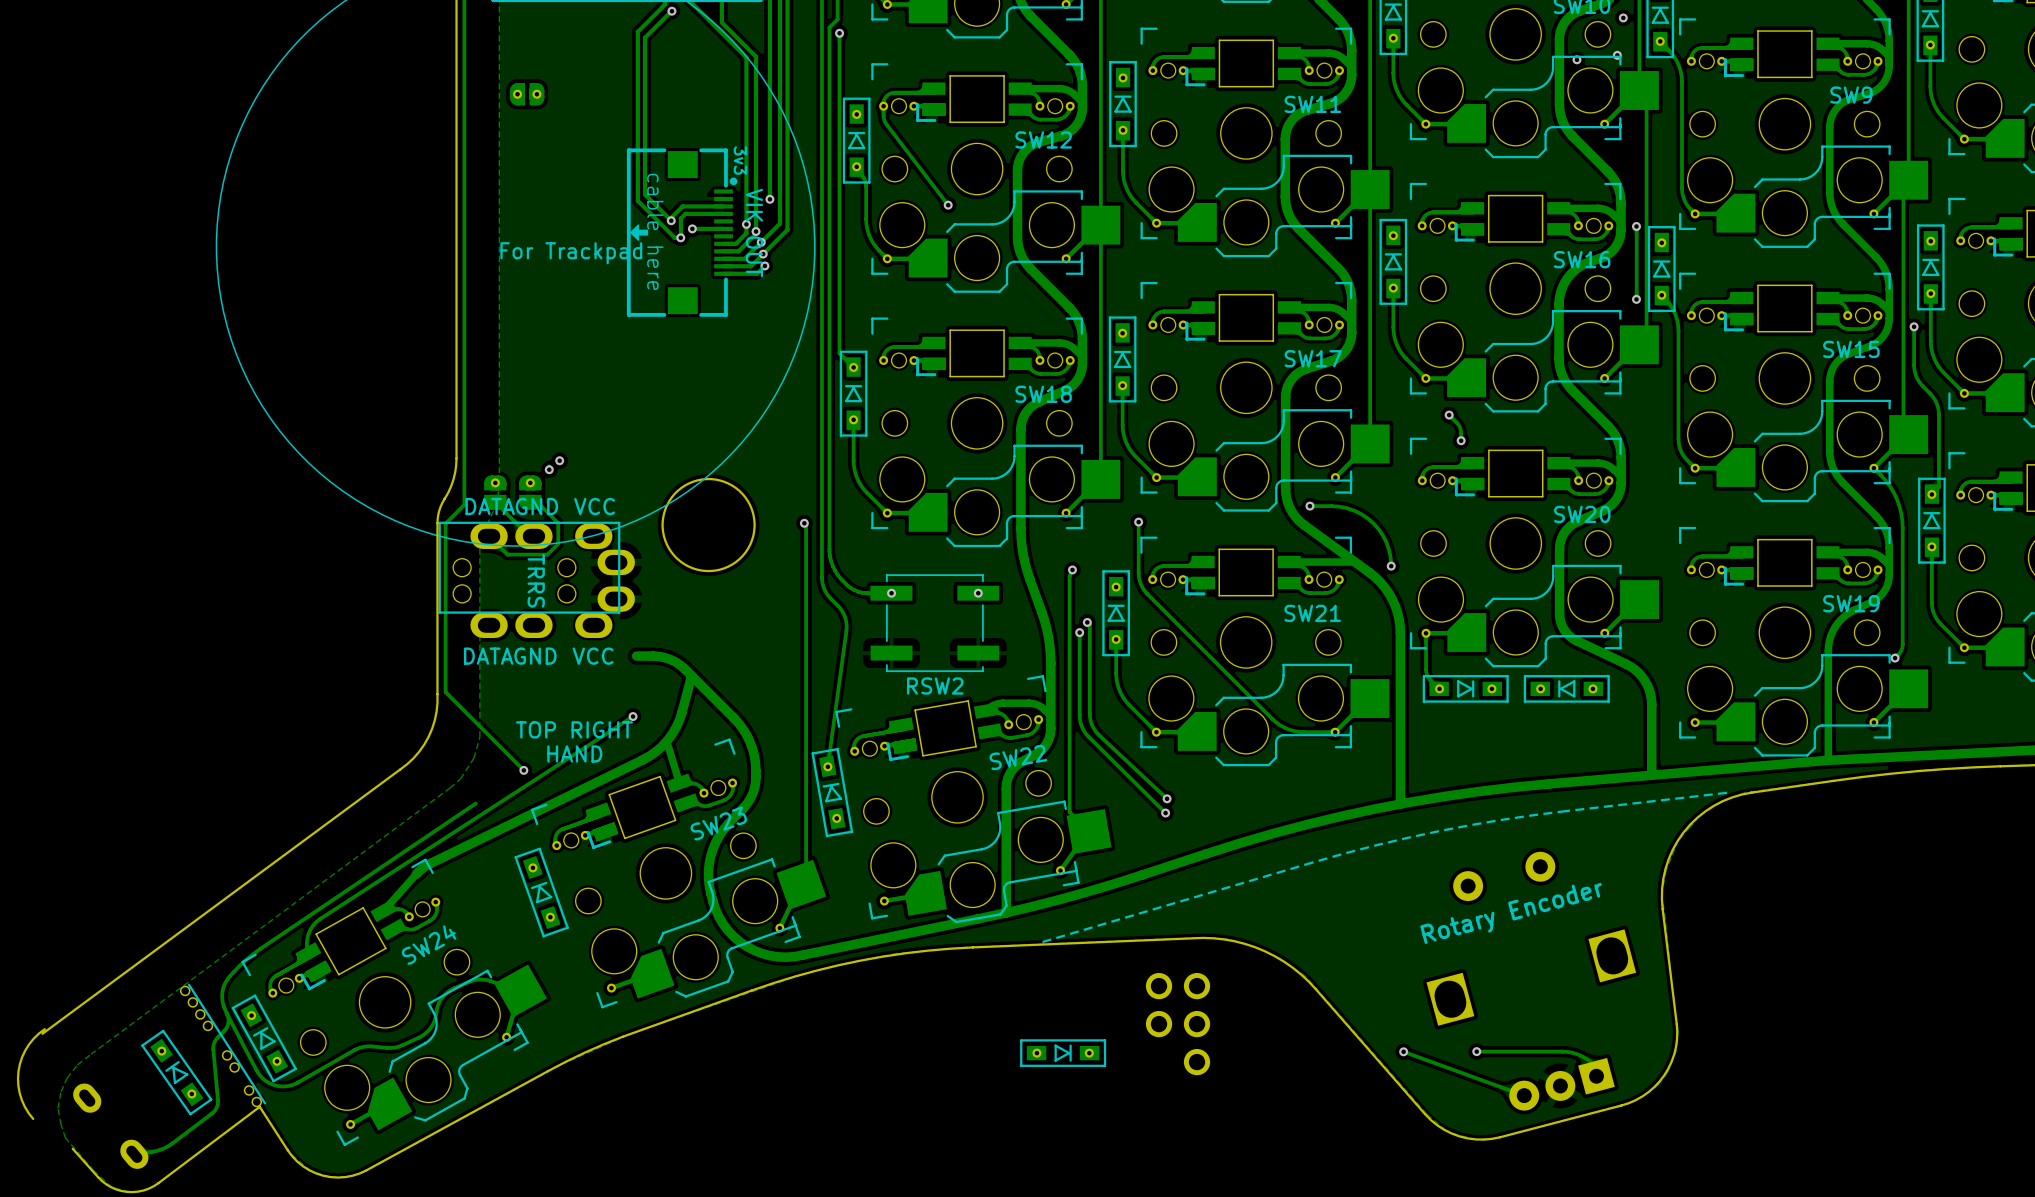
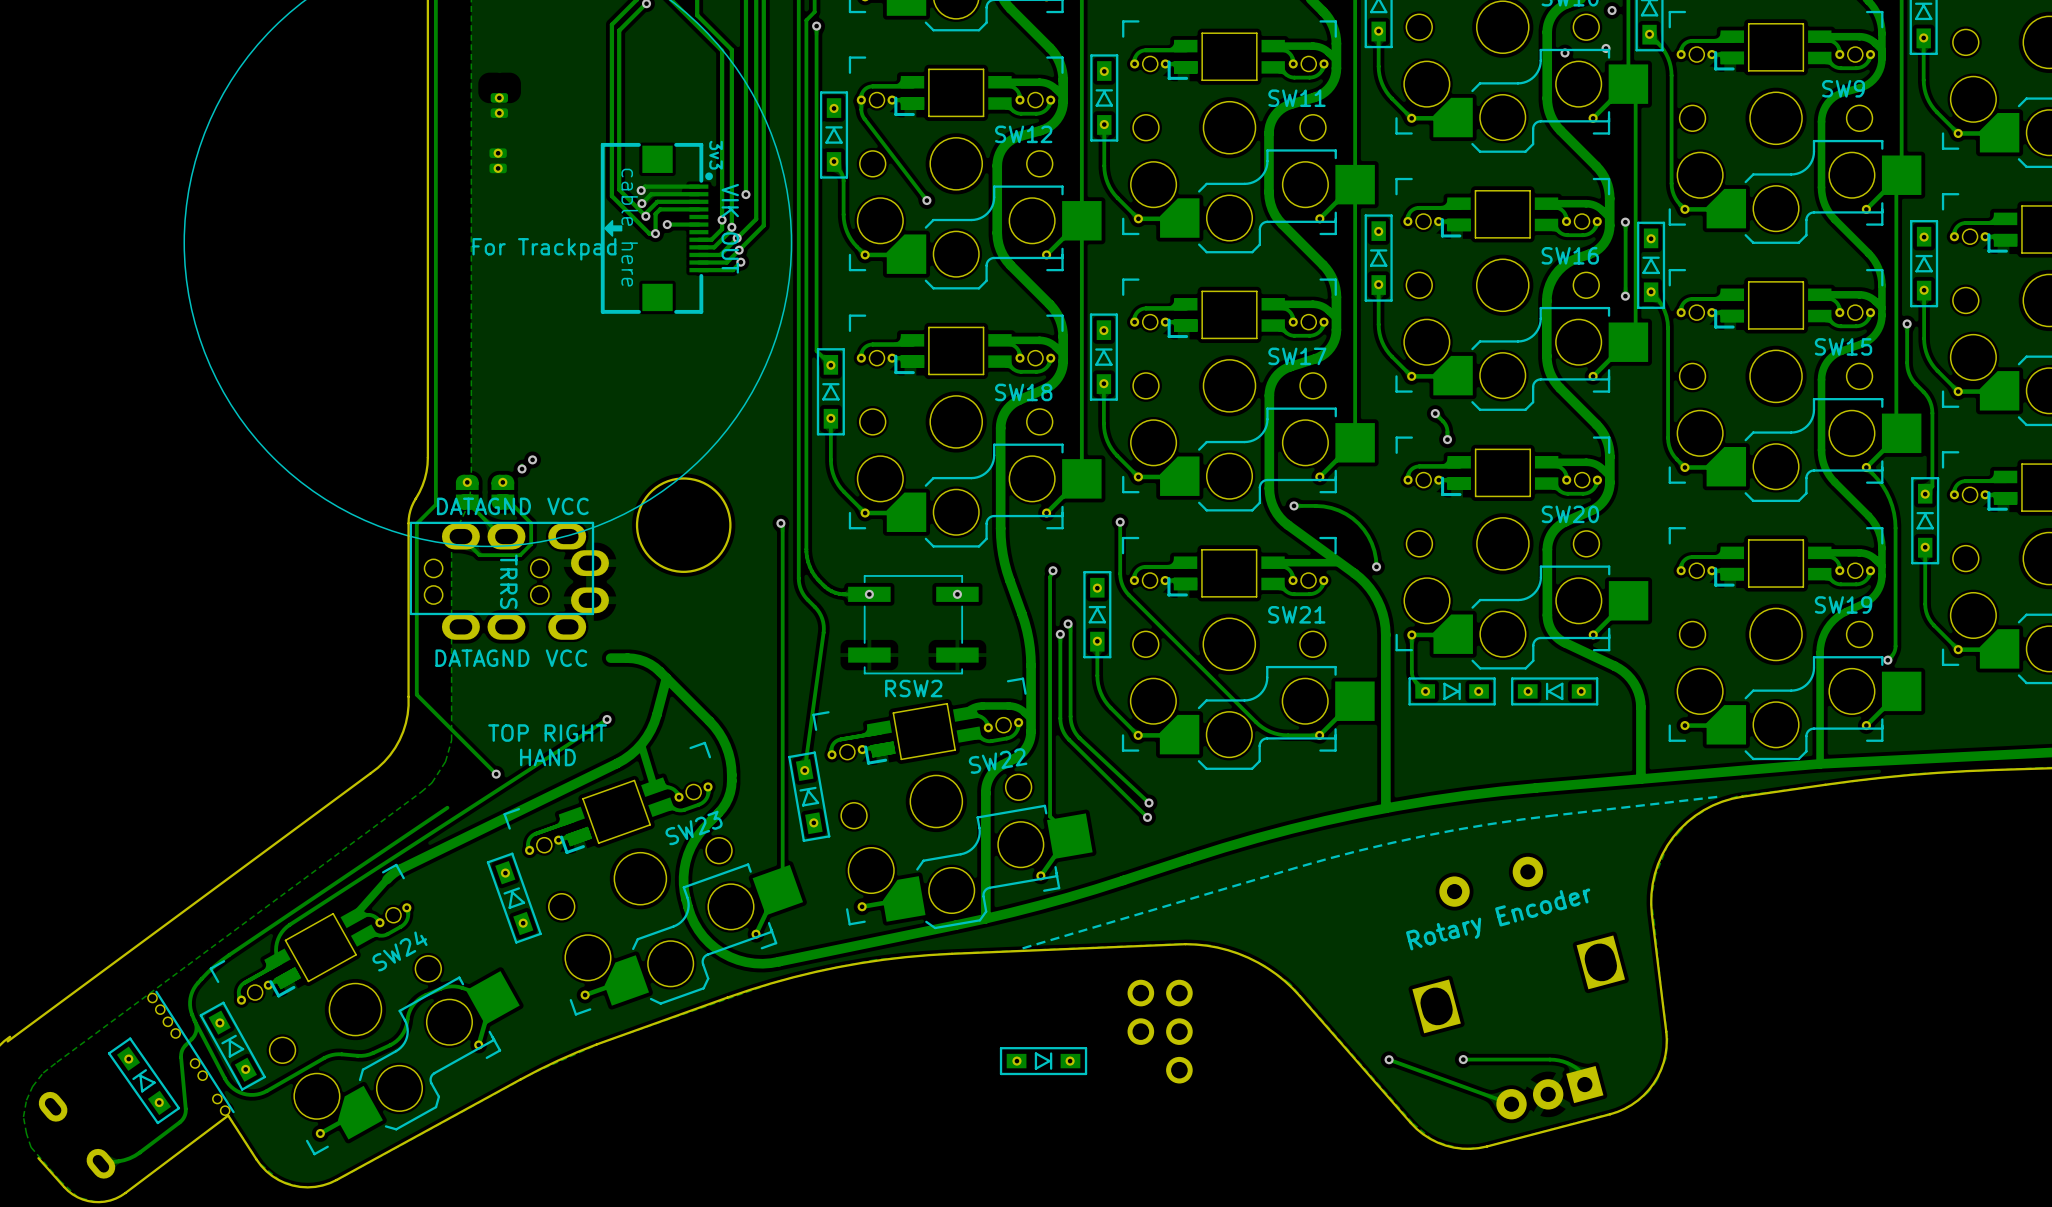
part: (527, 94) -> none
part: none -> (499, 105)
part: none -> (498, 160)
track: none -> (698, 186) (645, 186) (641, 190)
via: none -> (641, 190)
track: none -> (698, 194) (651, 194) (641, 203)
via: none -> (641, 203)

